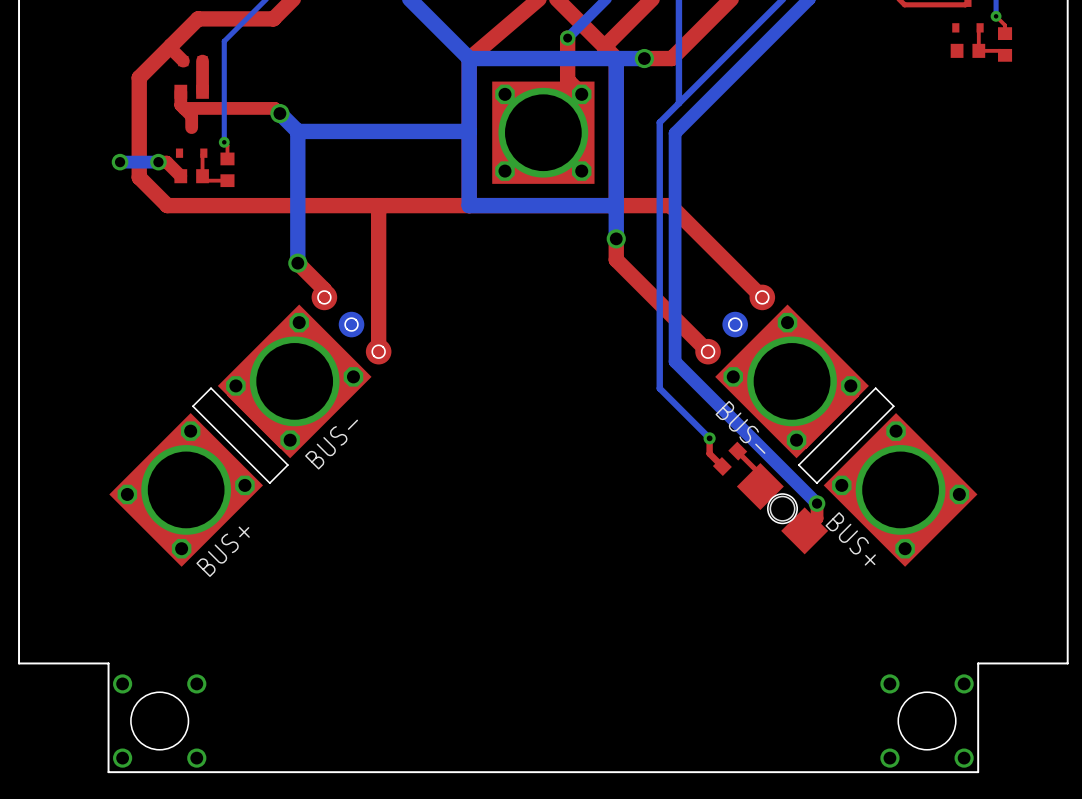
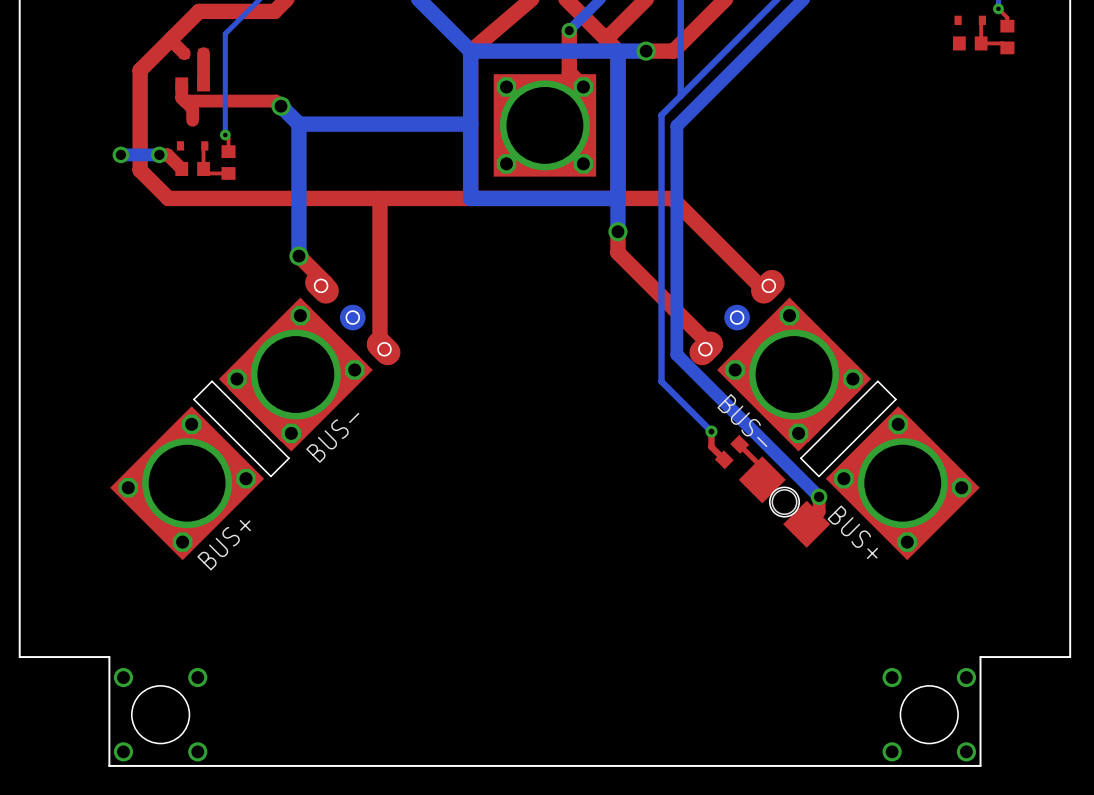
part footprint: [311, 284, 392, 365] -> [305, 269, 401, 366]
part footprint: [695, 284, 776, 365] -> [689, 269, 785, 366]

